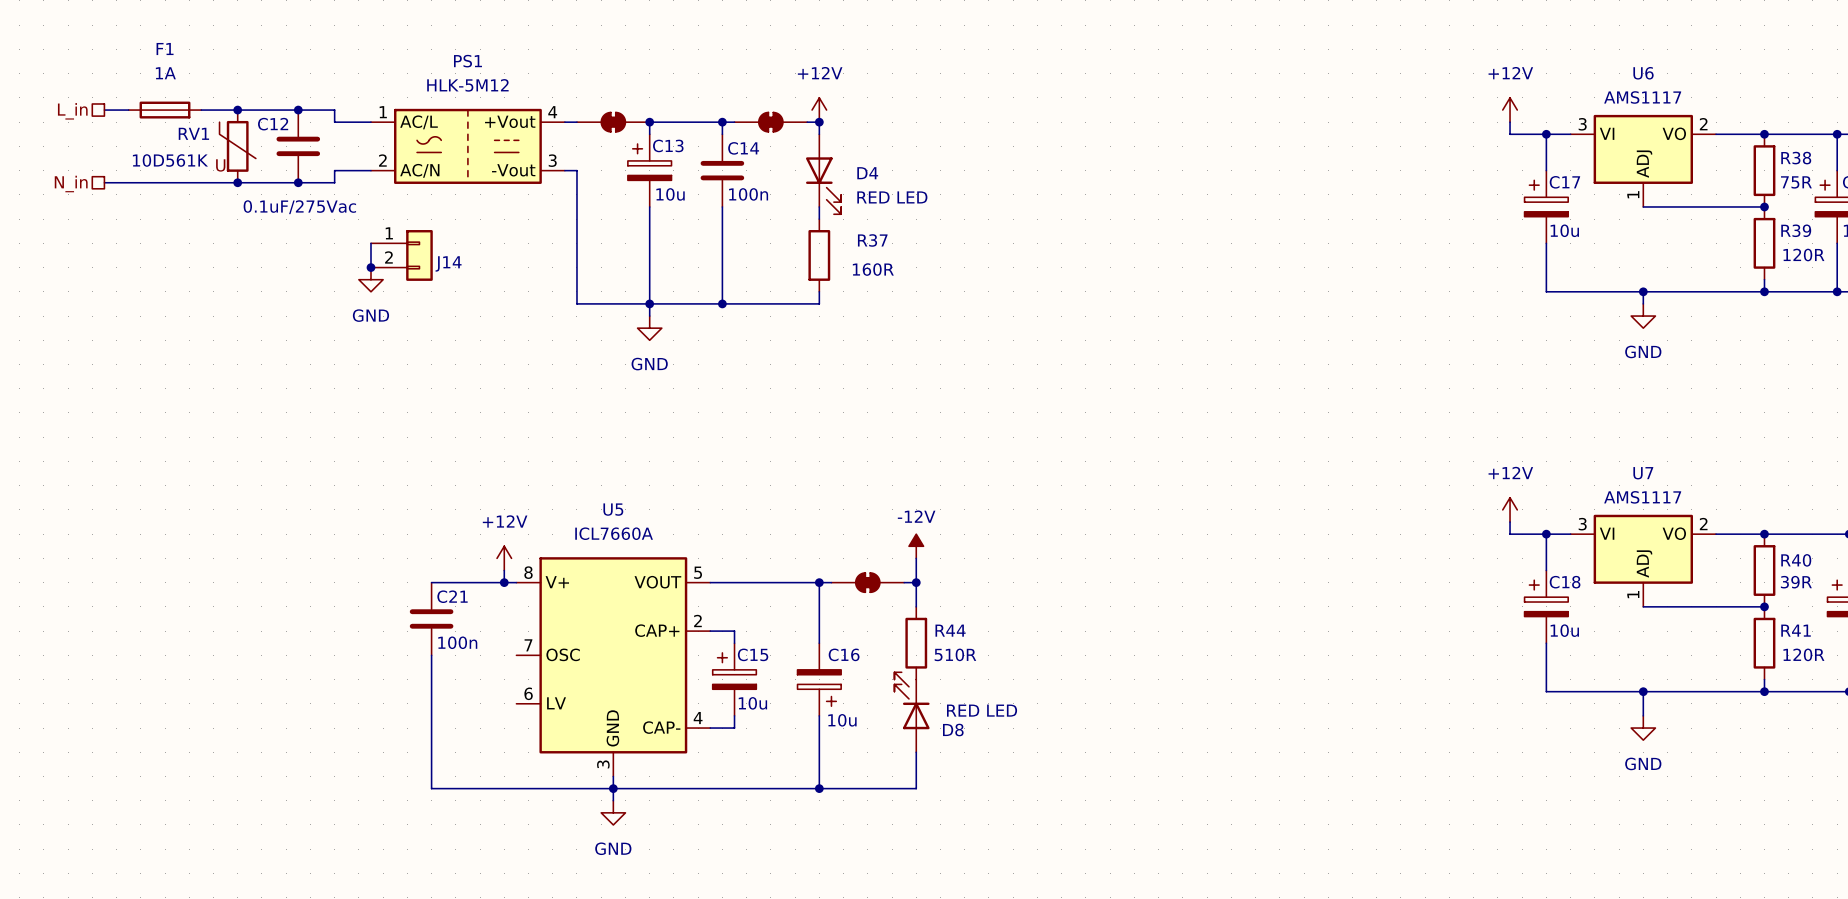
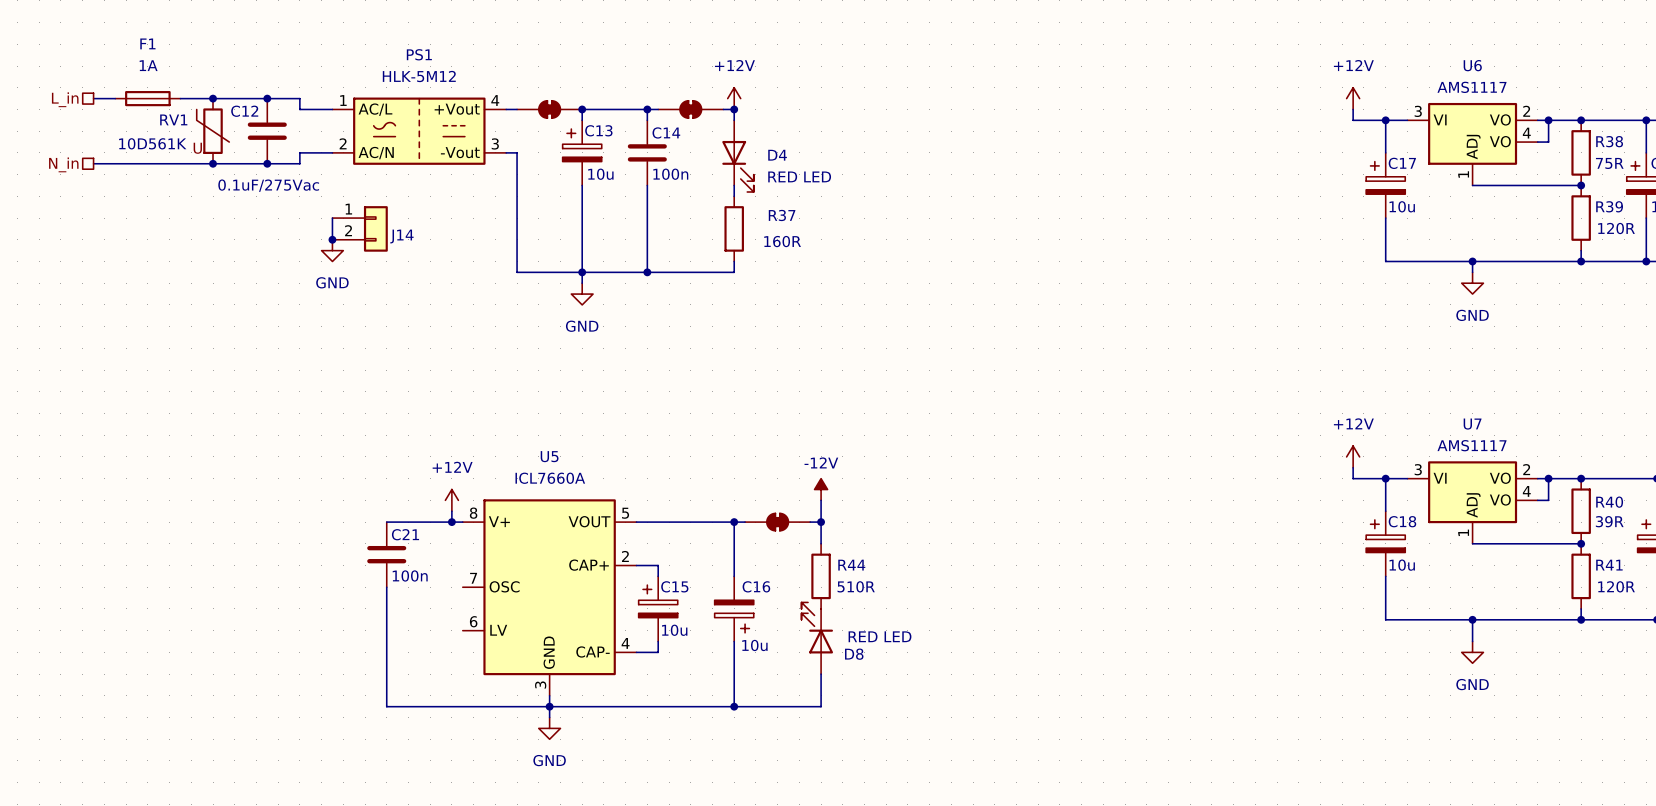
U6 symbol: [1570, 114, 1717, 207] -> [1407, 102, 1538, 186]
wire: none -> (1548, 120) (1548, 142) (1537, 142)
junction: none -> (1548, 120)
U7 symbol: [1570, 514, 1717, 607] -> [1407, 461, 1538, 544]
wire: none -> (1548, 478) (1548, 500) (1537, 500)
junction: none -> (1548, 478)

